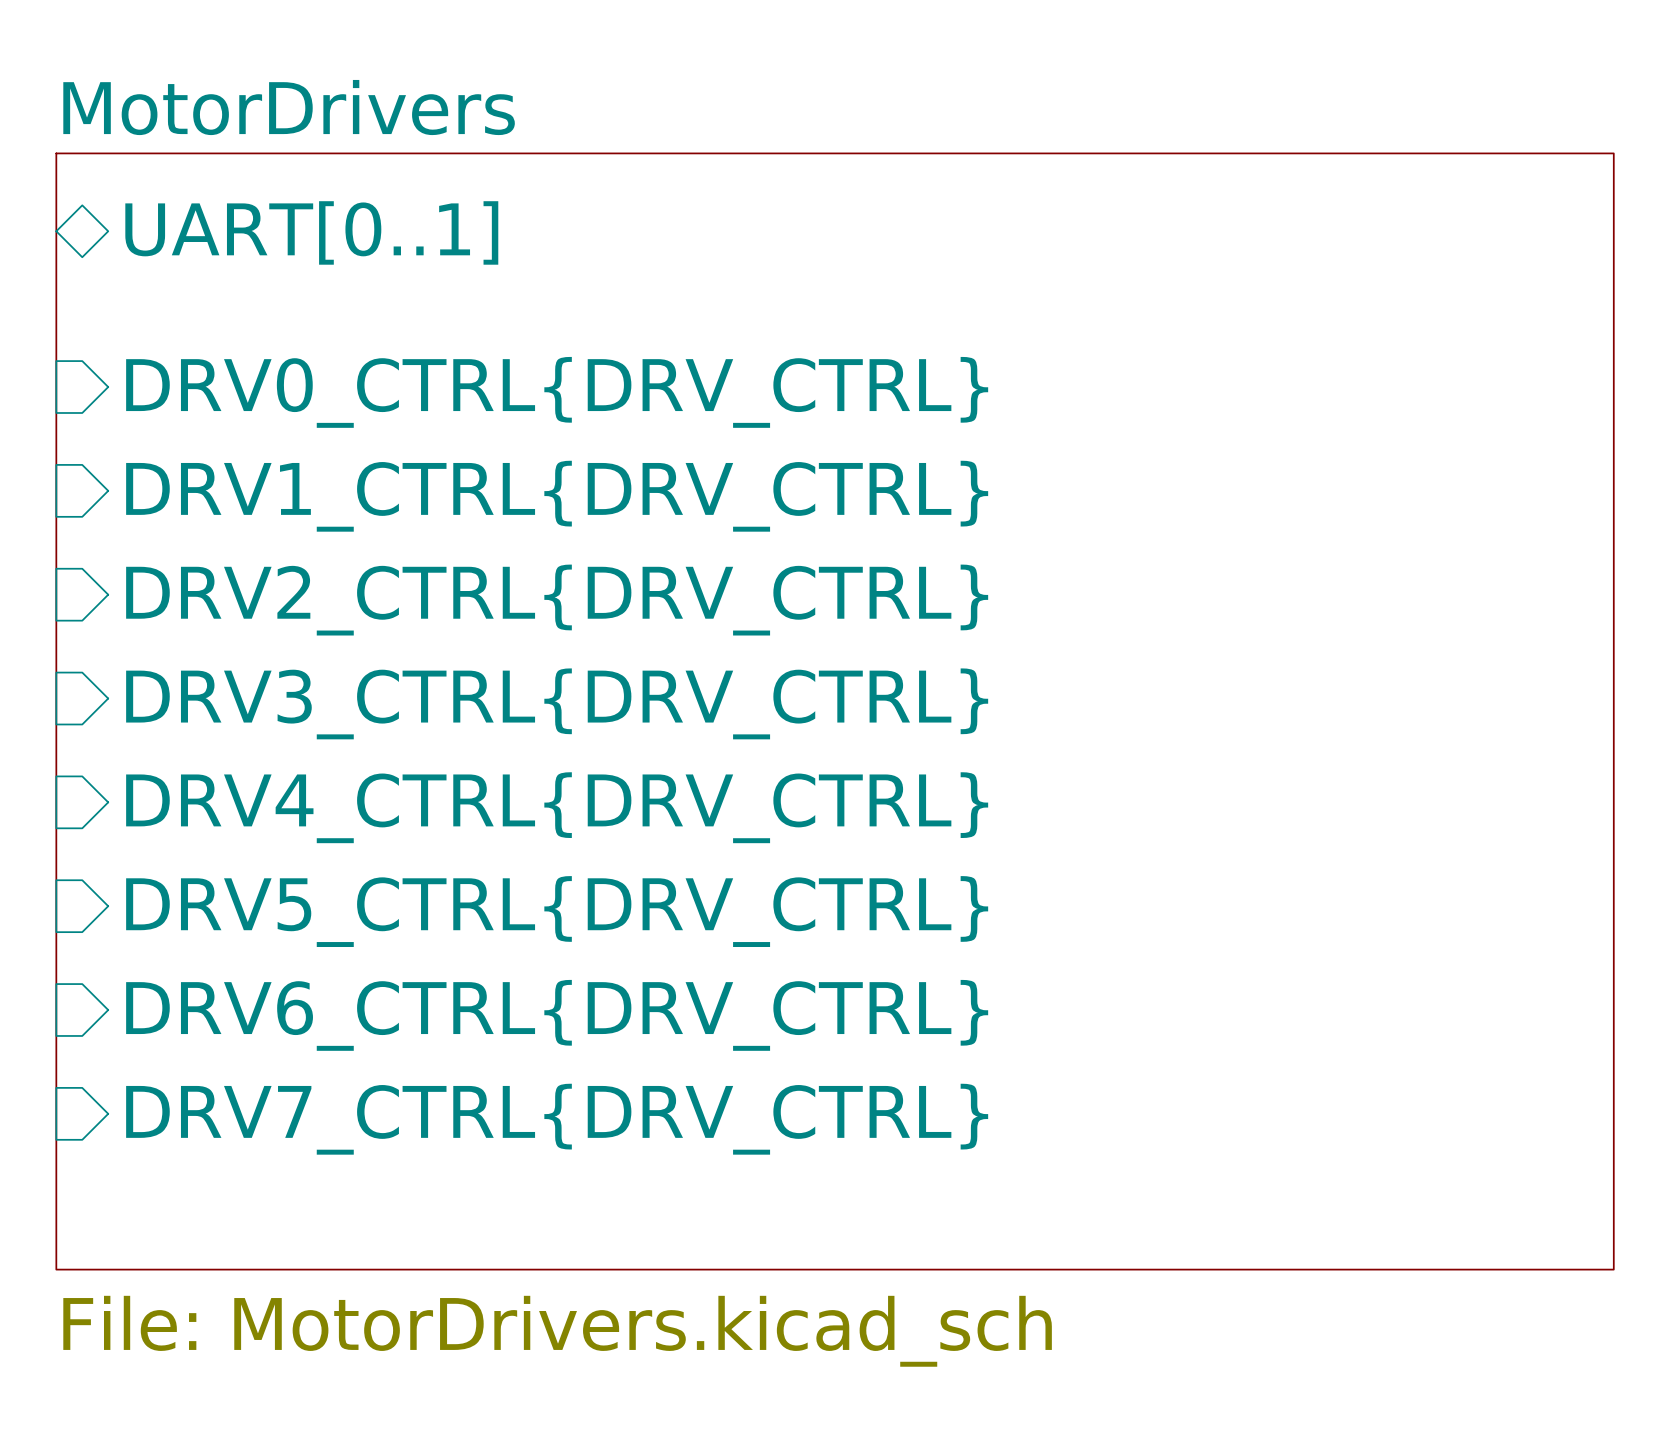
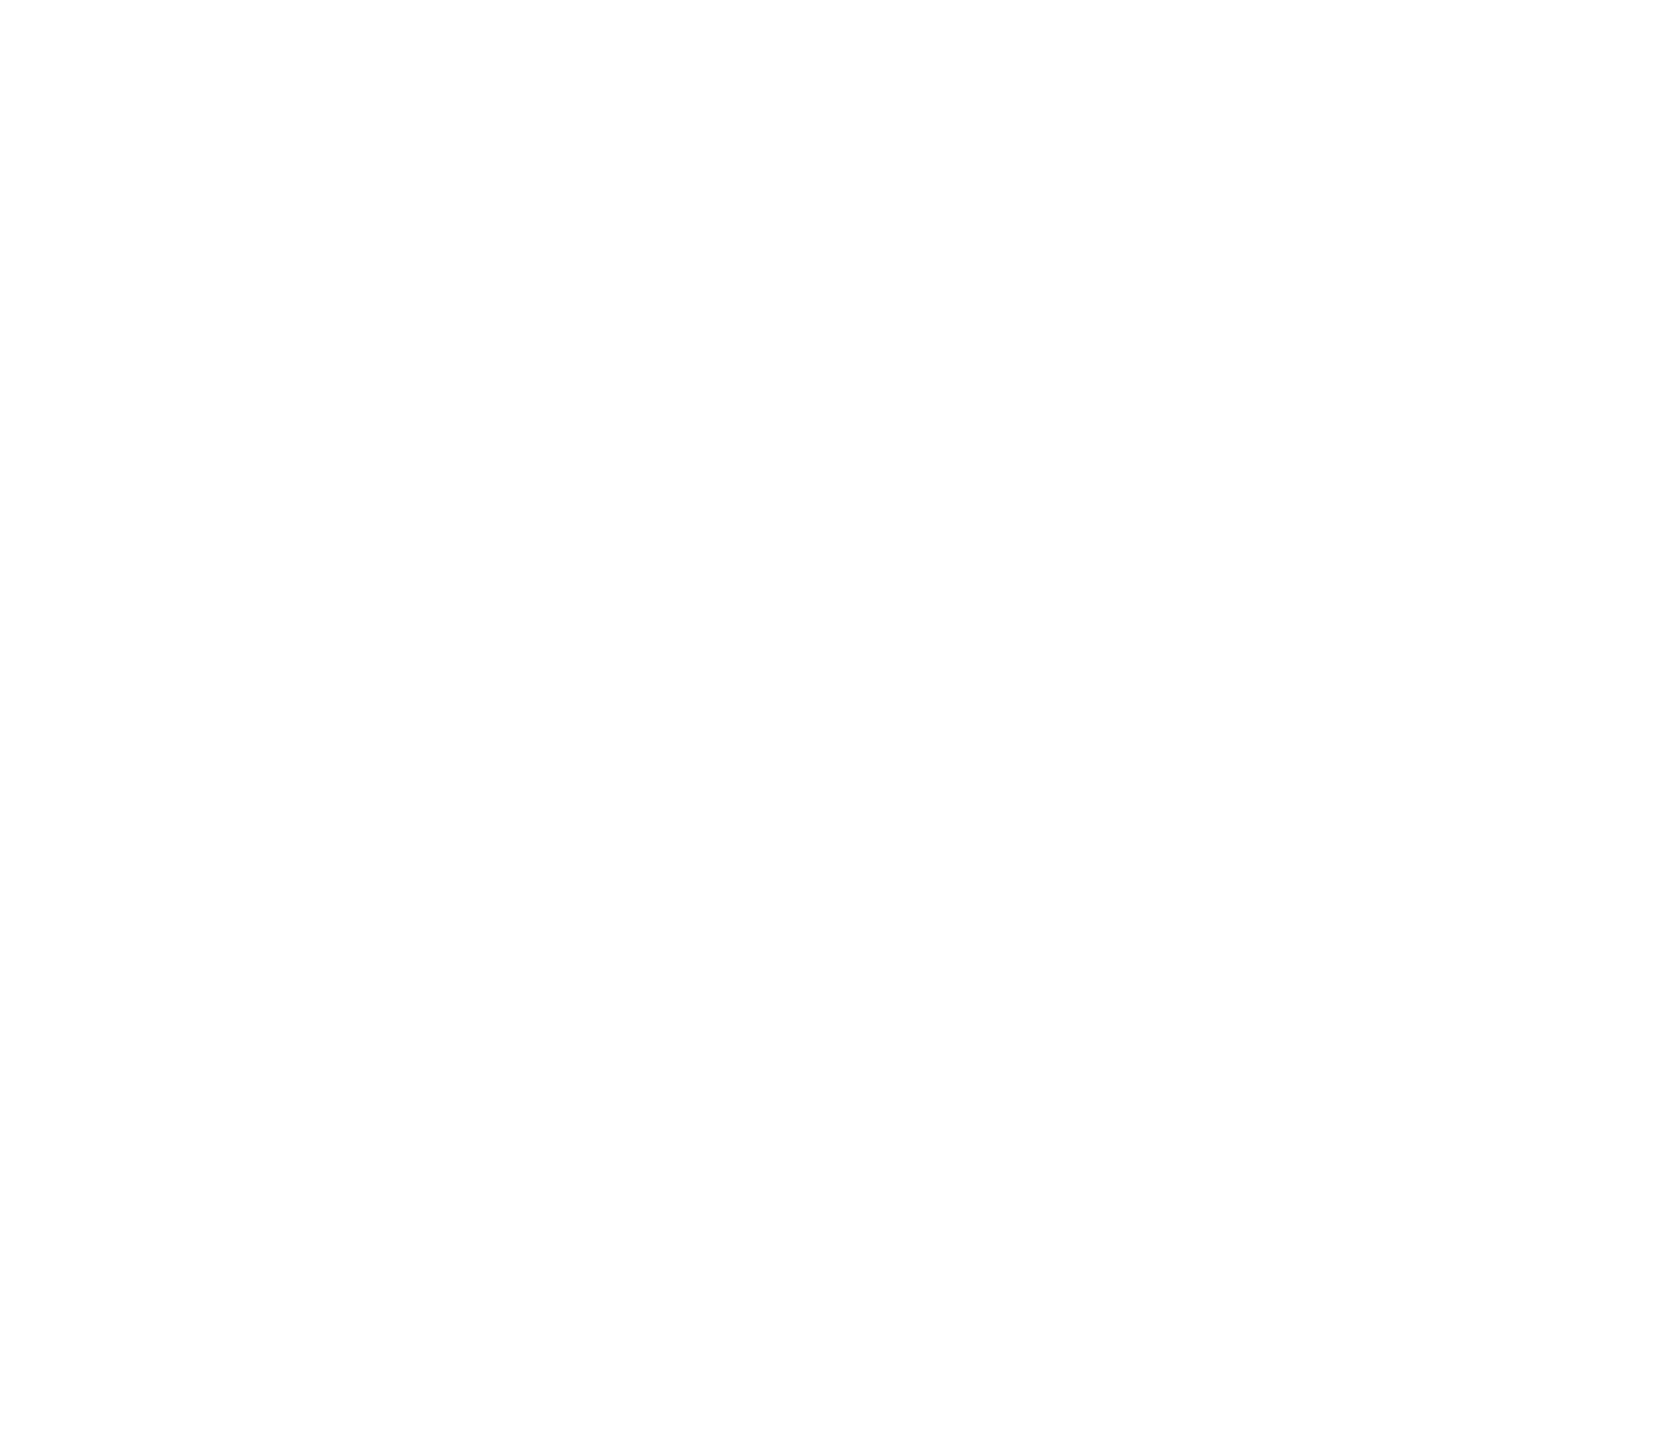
sheet pin: UART[0..1] (311, 232) -> none
sheet pin: DRV0_CTRL{DRV_CTRL} (557, 392) -> none
sheet pin: DRV1_CTRL{DRV_CTRL} (557, 496) -> none
sheet pin: DRV2_CTRL{DRV_CTRL} (557, 600) -> none
sheet pin: DRV3_CTRL{DRV_CTRL} (557, 703) -> none
sheet MotorDrivers: File: MotorDrivers.kicad_sch (835, 711) -> none
sheet pin: DRV4_CTRL{DRV_CTRL} (557, 807) -> none
sheet pin: DRV5_CTRL{DRV_CTRL} (557, 911) -> none
sheet pin: DRV6_CTRL{DRV_CTRL} (557, 1015) -> none
sheet pin: DRV7_CTRL{DRV_CTRL} (557, 1119) -> none

